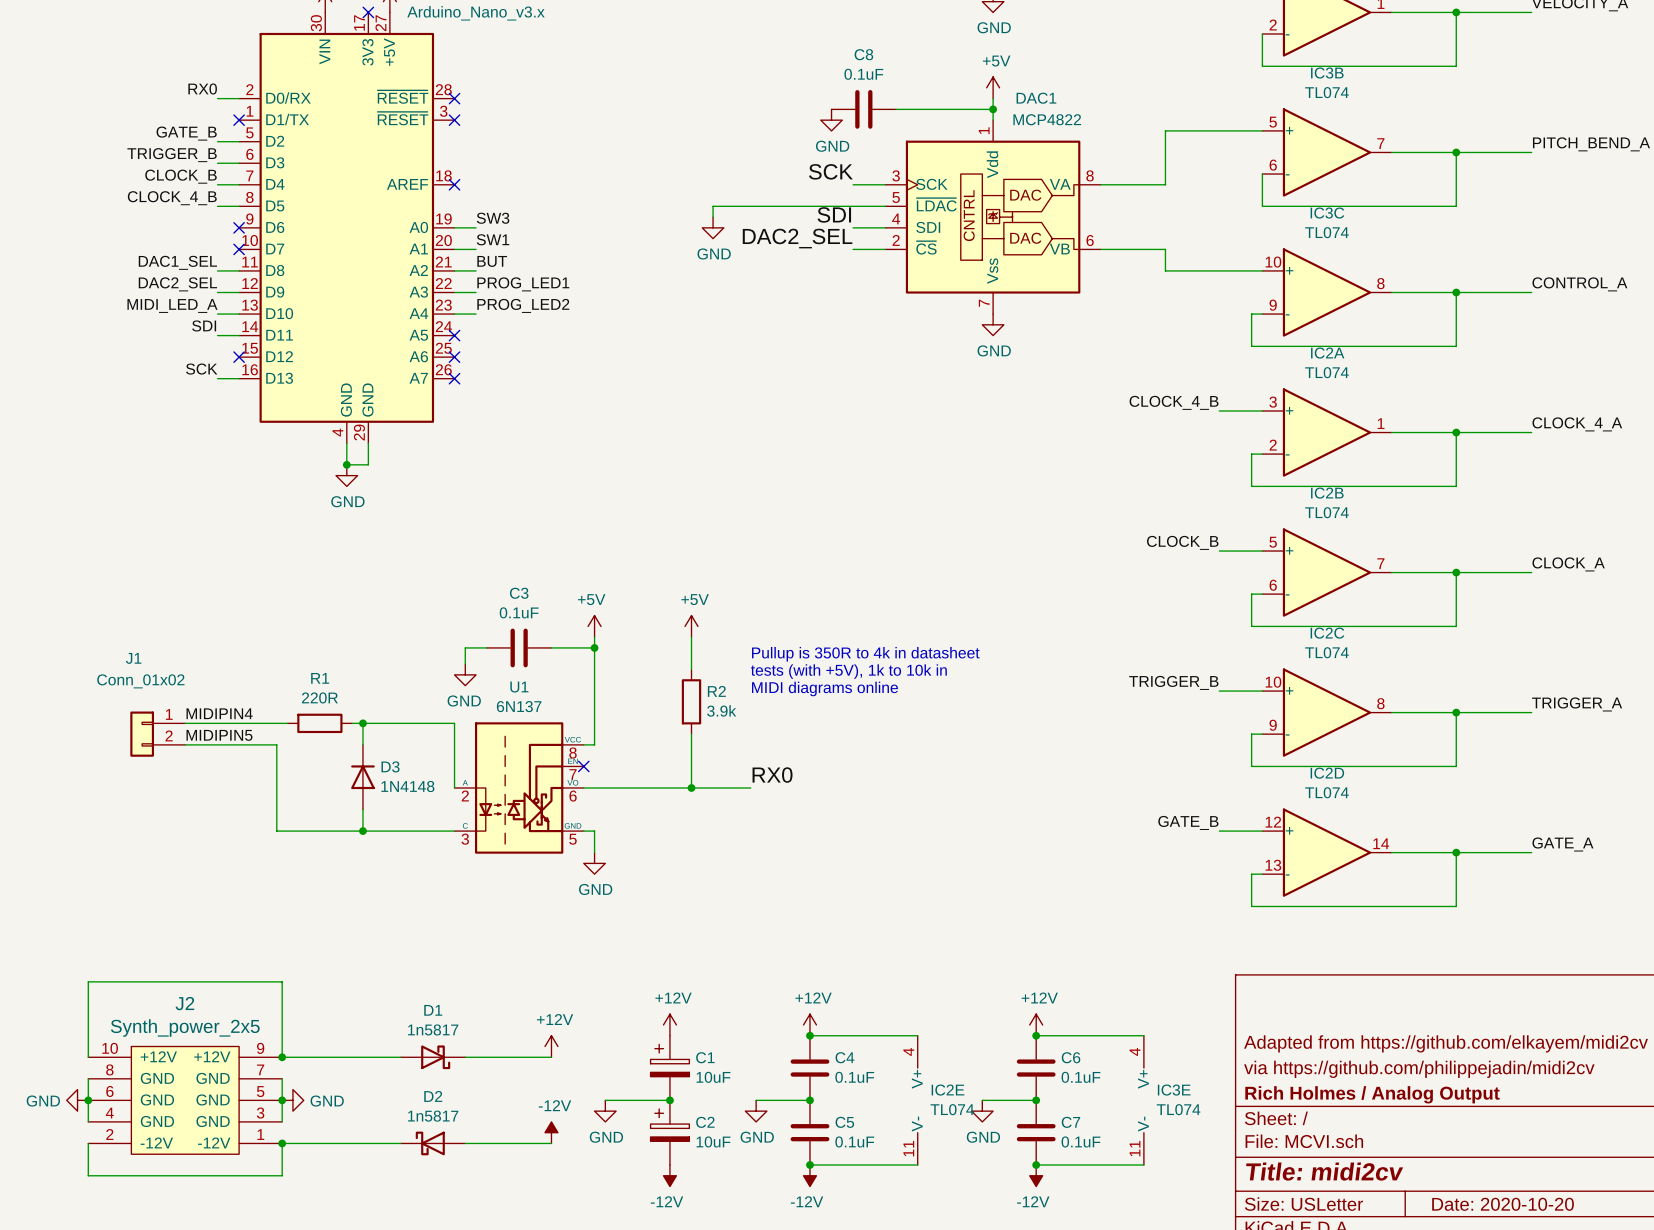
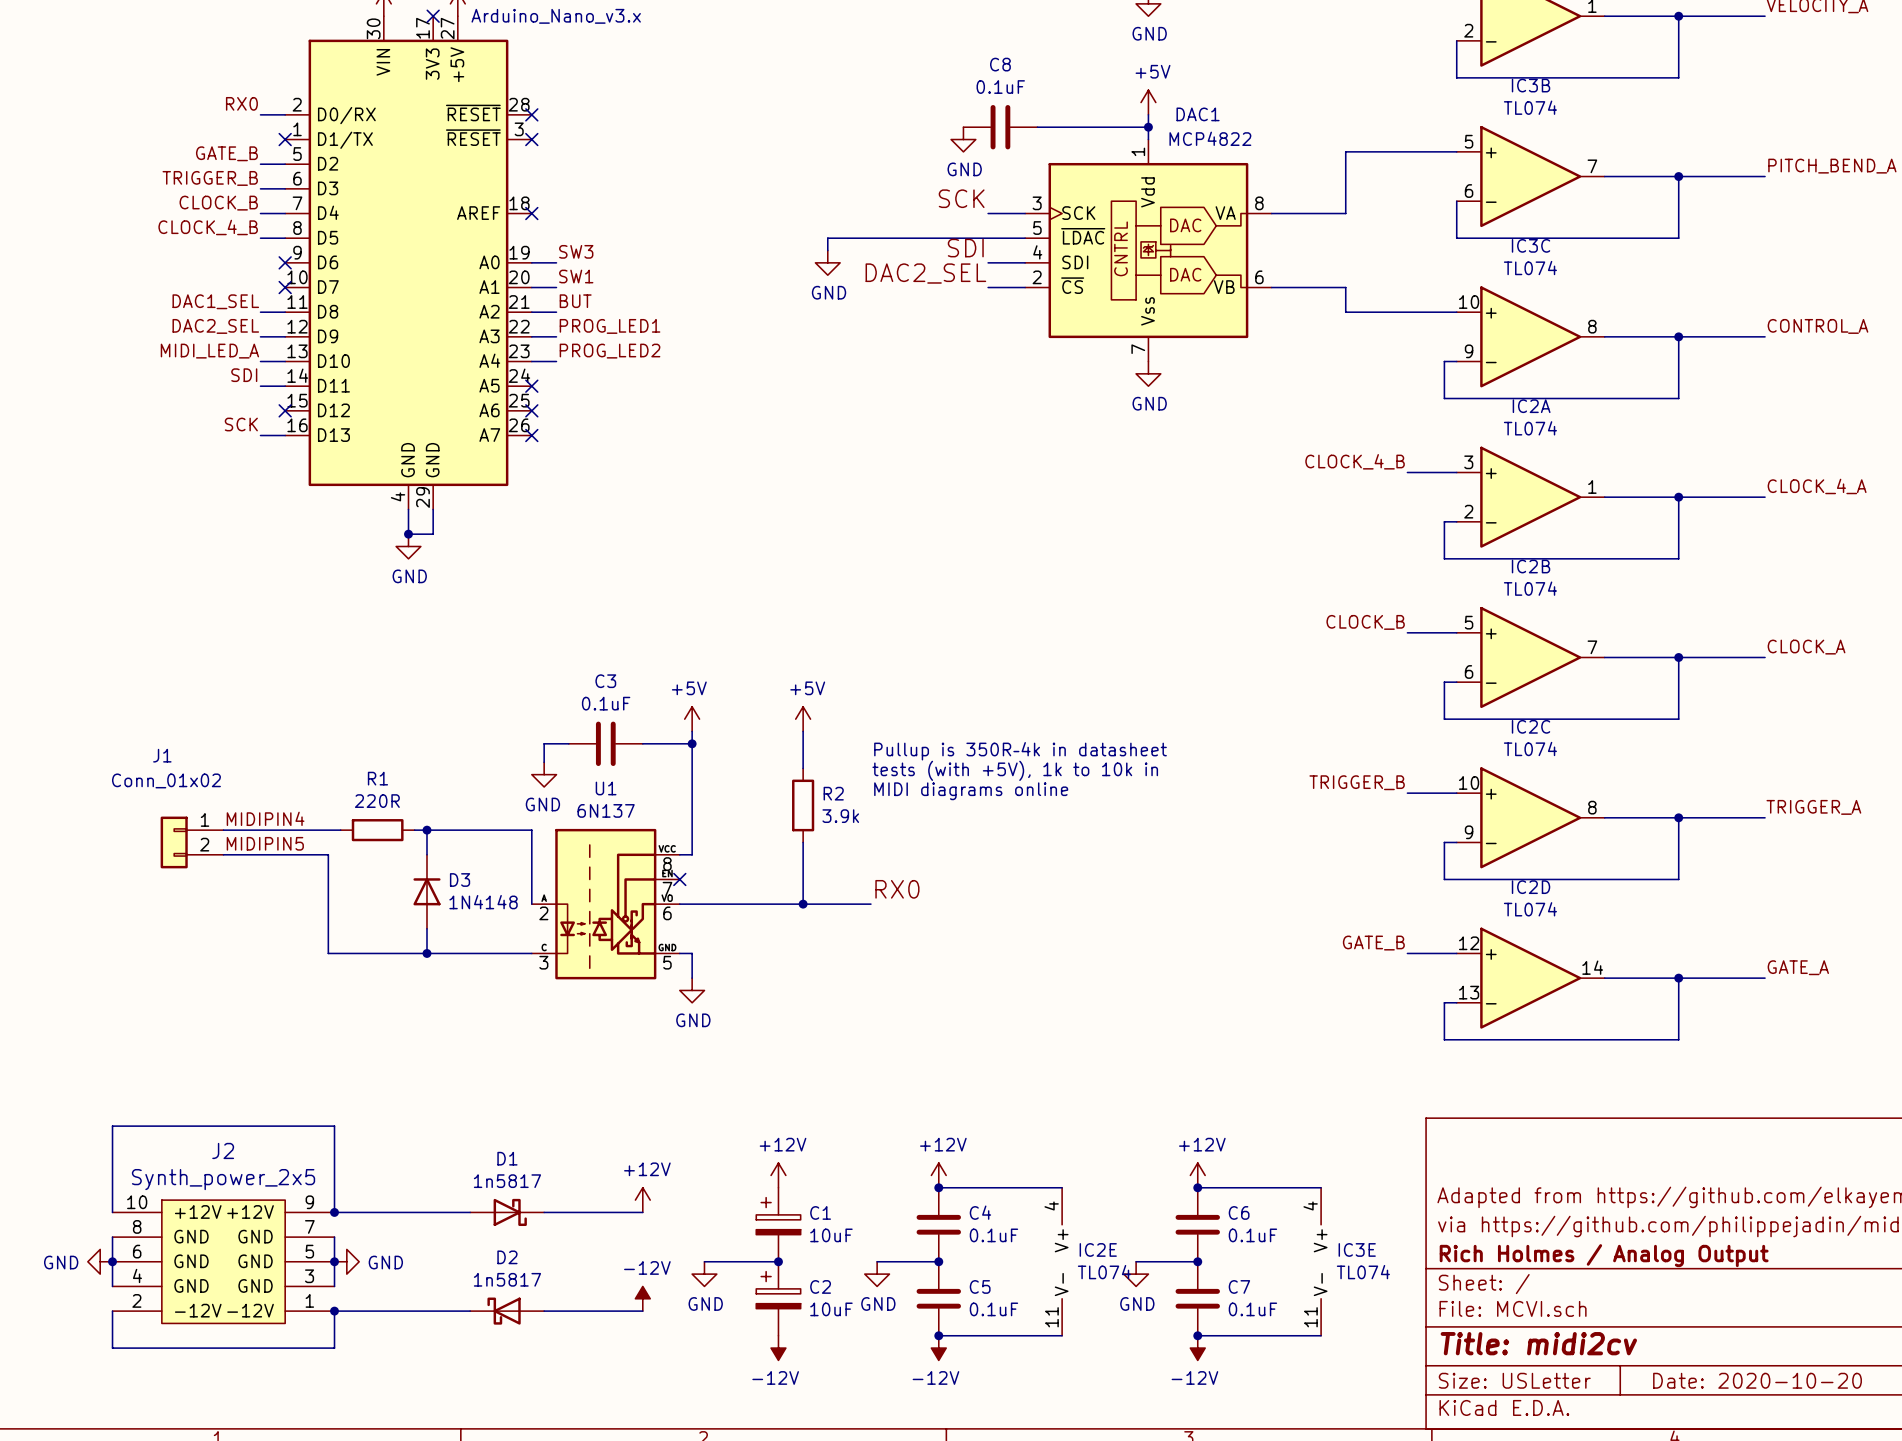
text: Pullup is 350R to 4k in datasheet (865, 654) -> Pullup is 350R–4k in datasheet (1020, 751)

